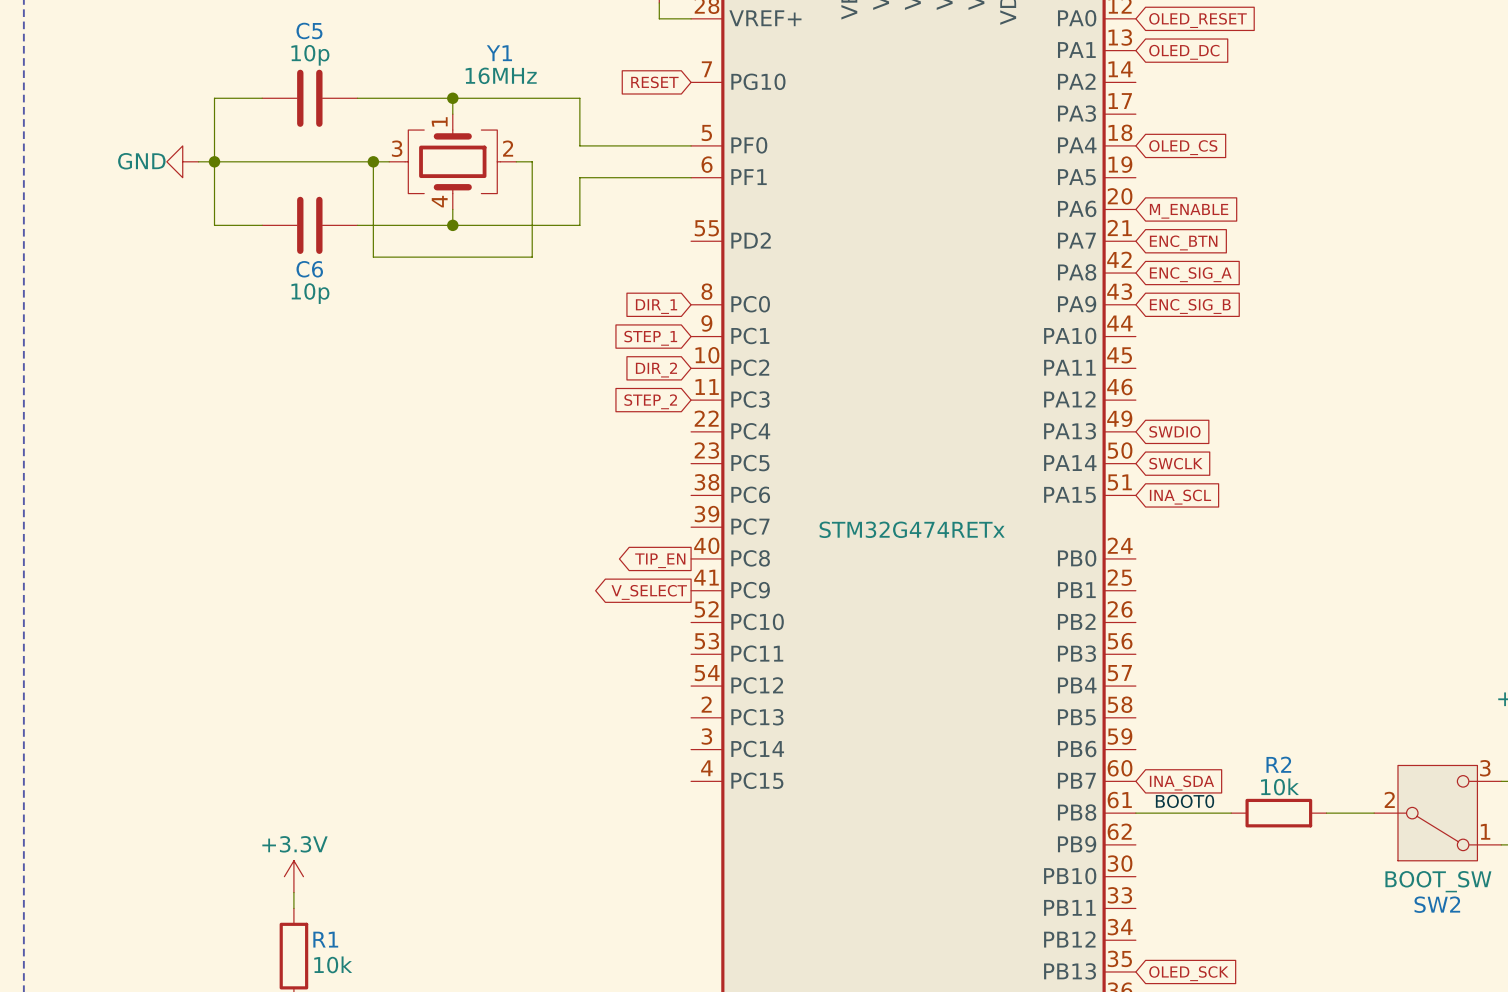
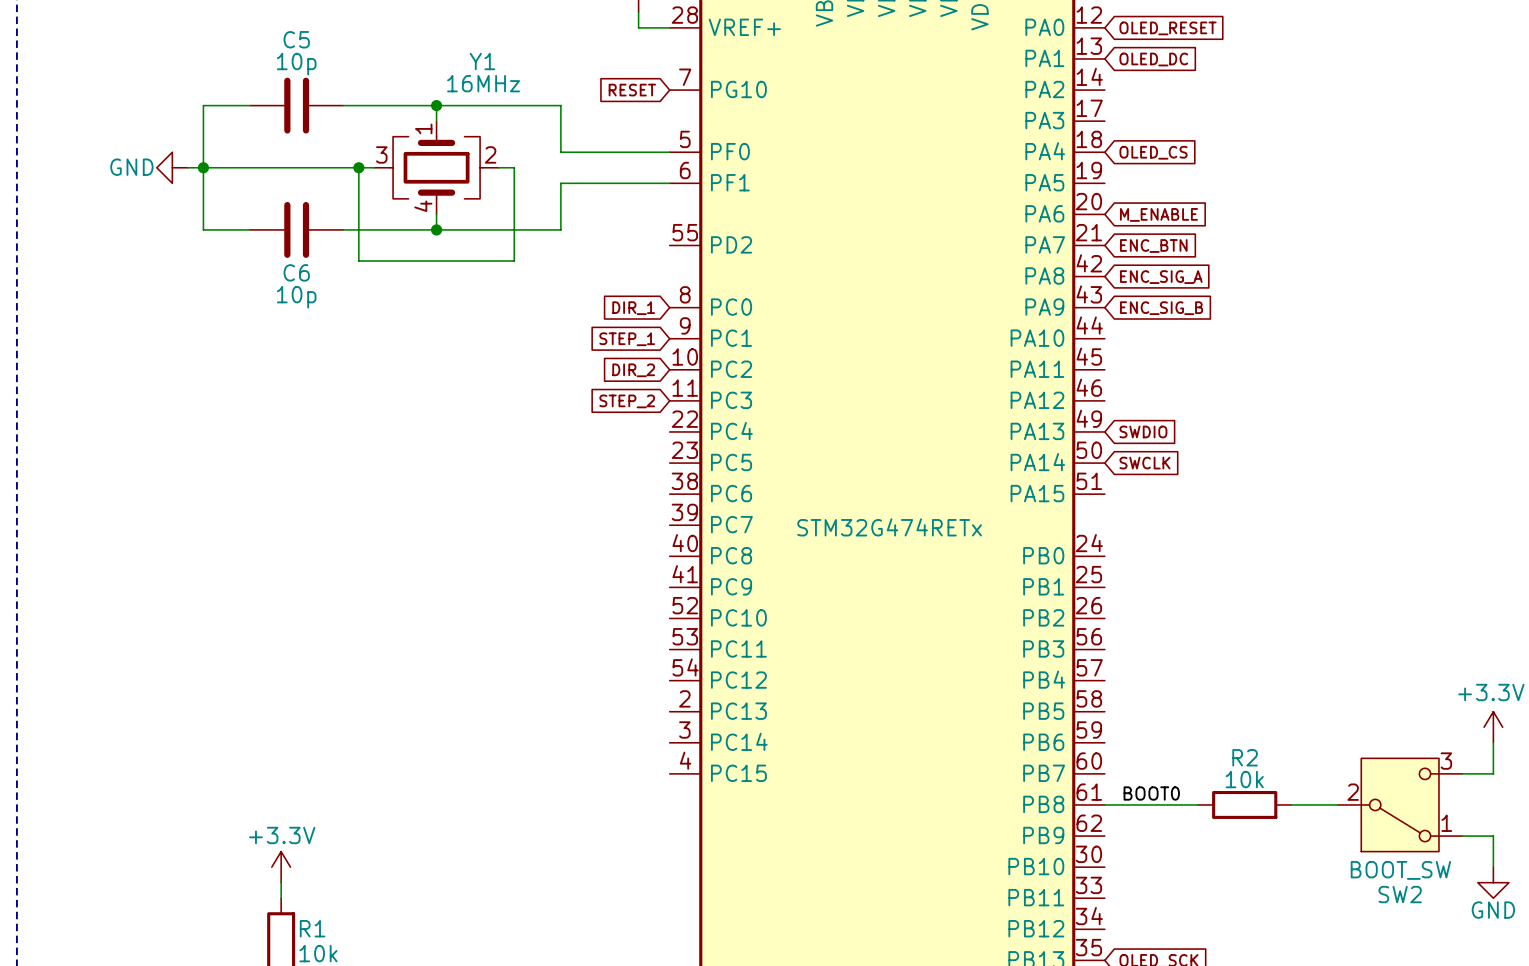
global label: INA_SCL (1180, 497) -> none
global label: TIP_EN (660, 560) -> none
global label: V_SELECT (649, 592) -> none
global label: INA_SDA (1181, 783) -> none

